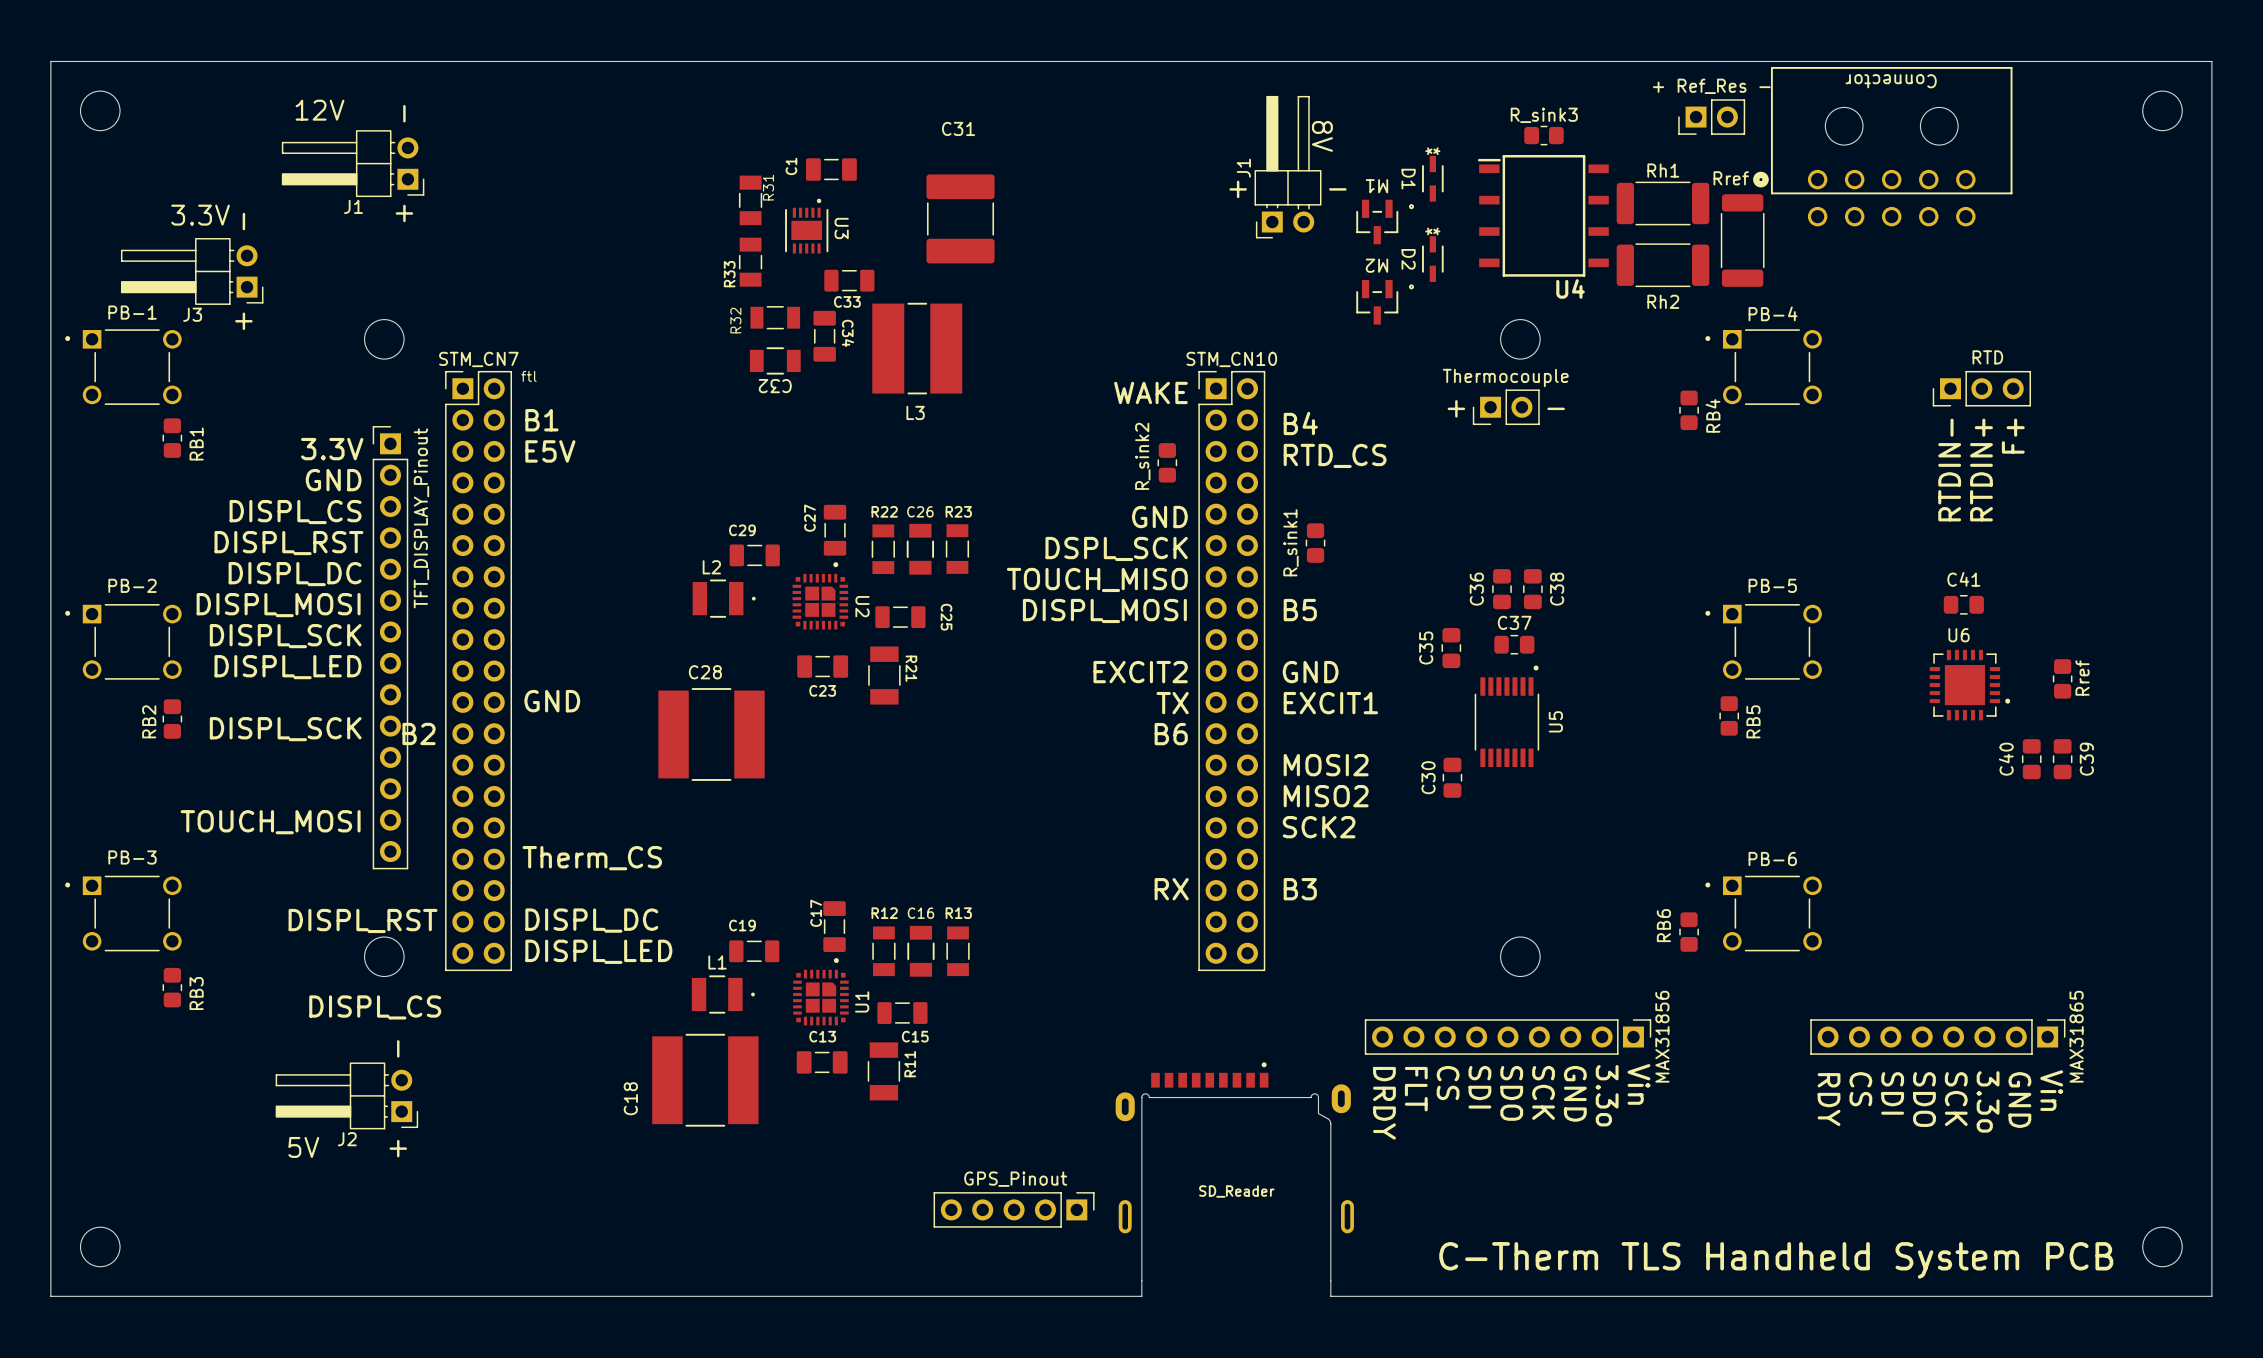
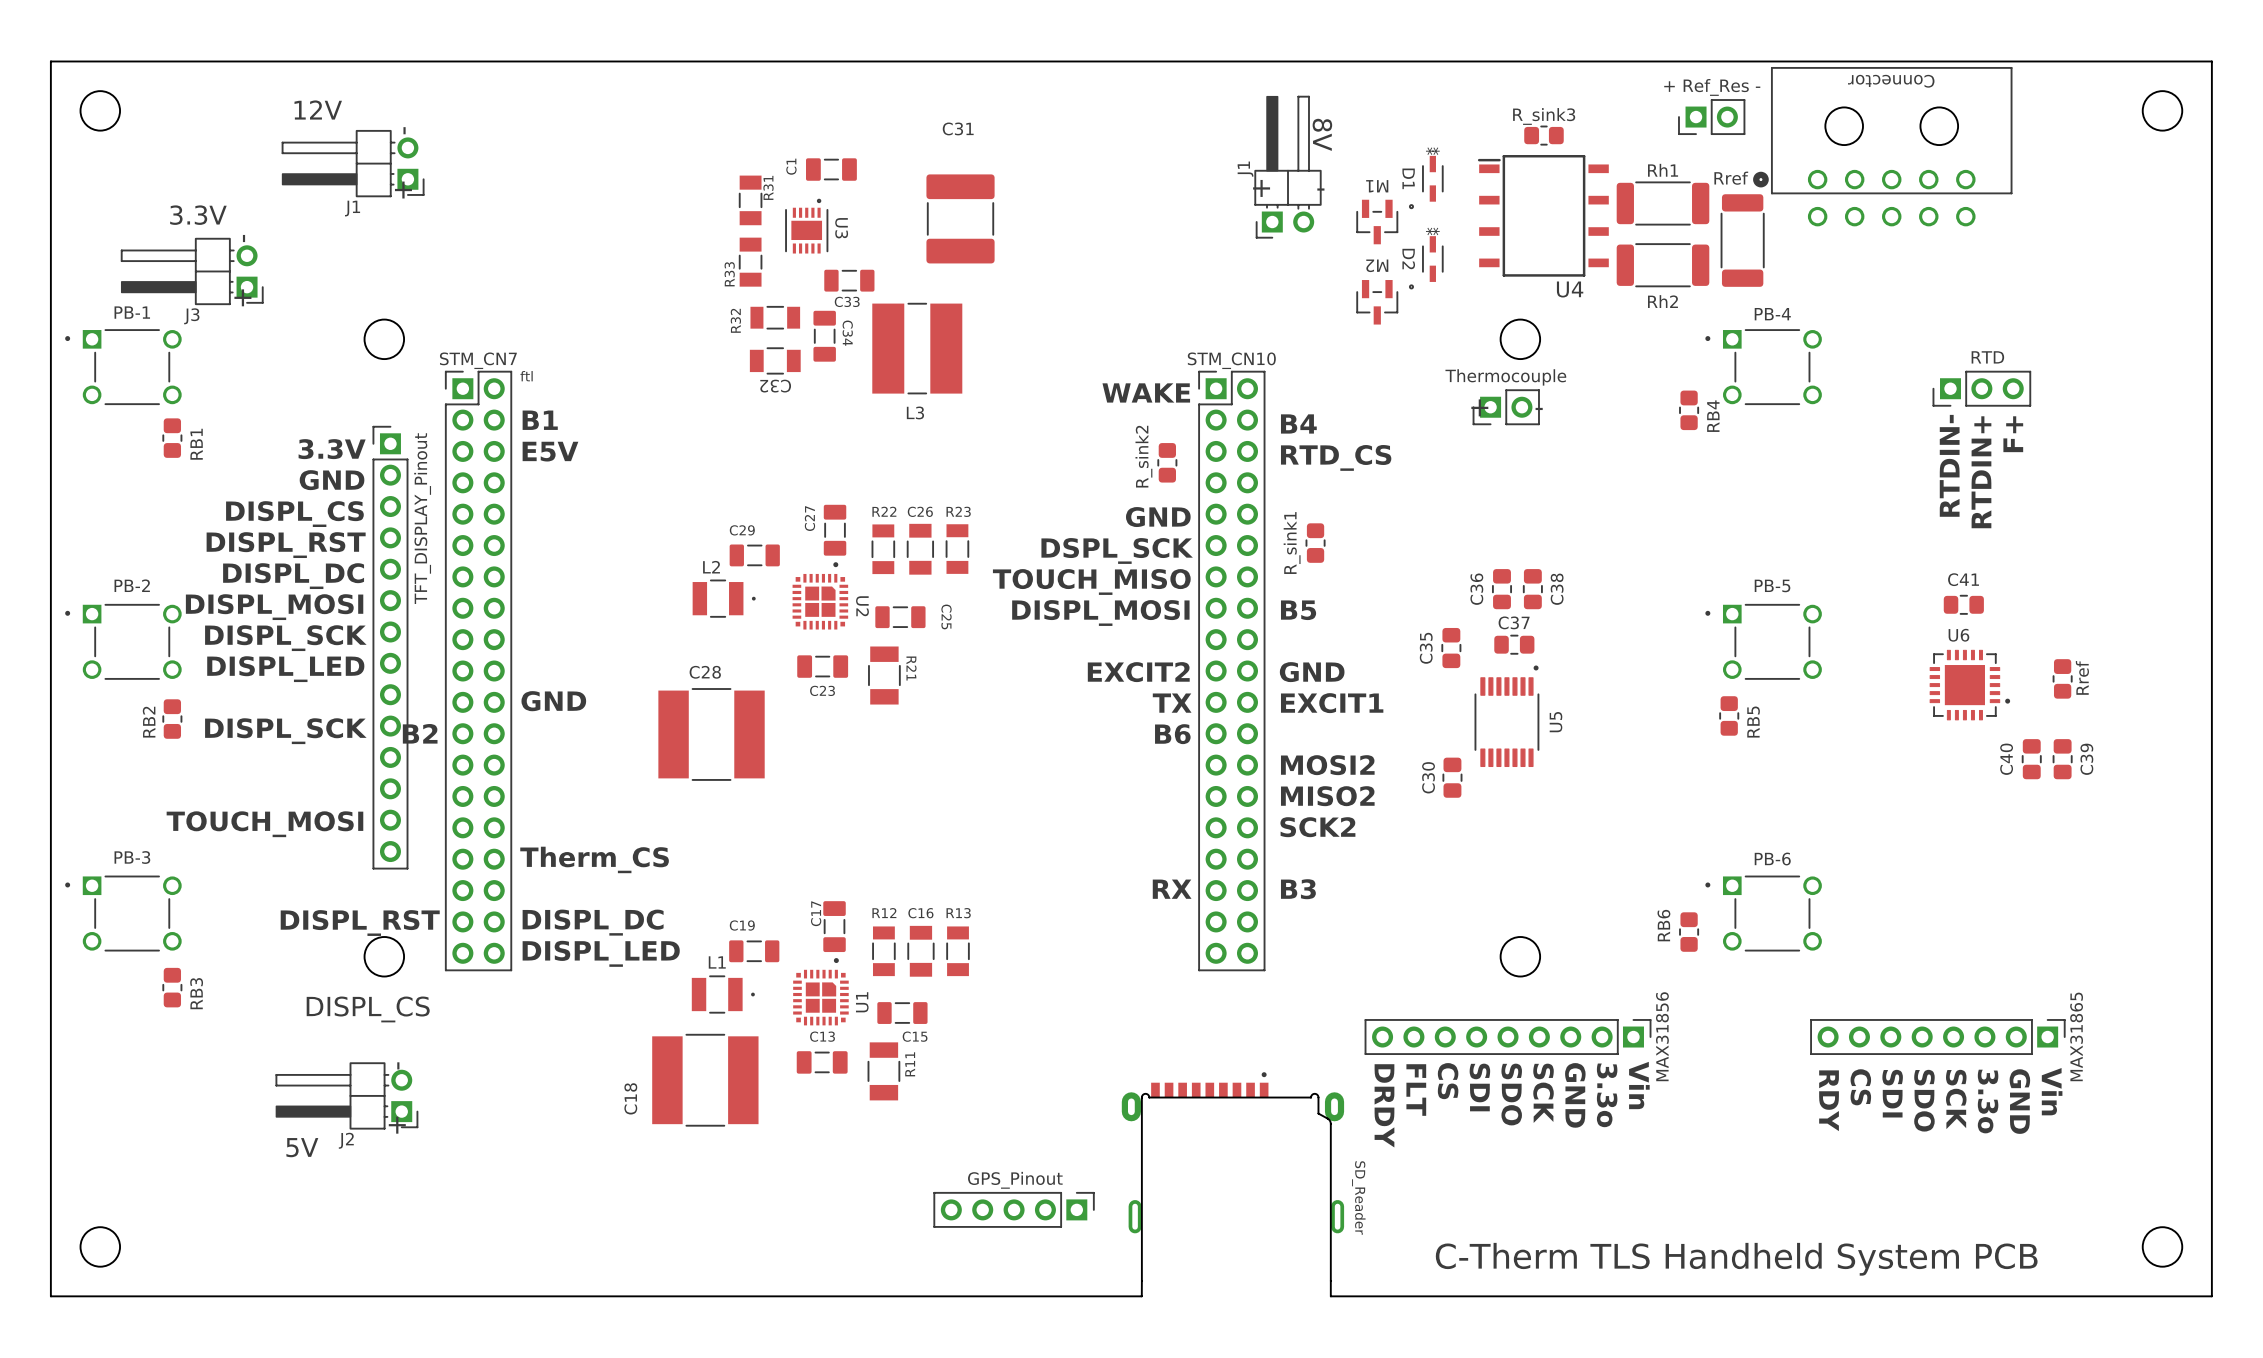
SD_Reader footprint: [1115, 1062, 1354, 1281] -> [1121, 1072, 1345, 1281]
SD_Reader name rotation: 0° (1236, 1191) -> 90° clockwise (1358, 1198)
SD_Reader name position: SD_Reader (1236, 1191) -> SD_Reader (1358, 1198)

